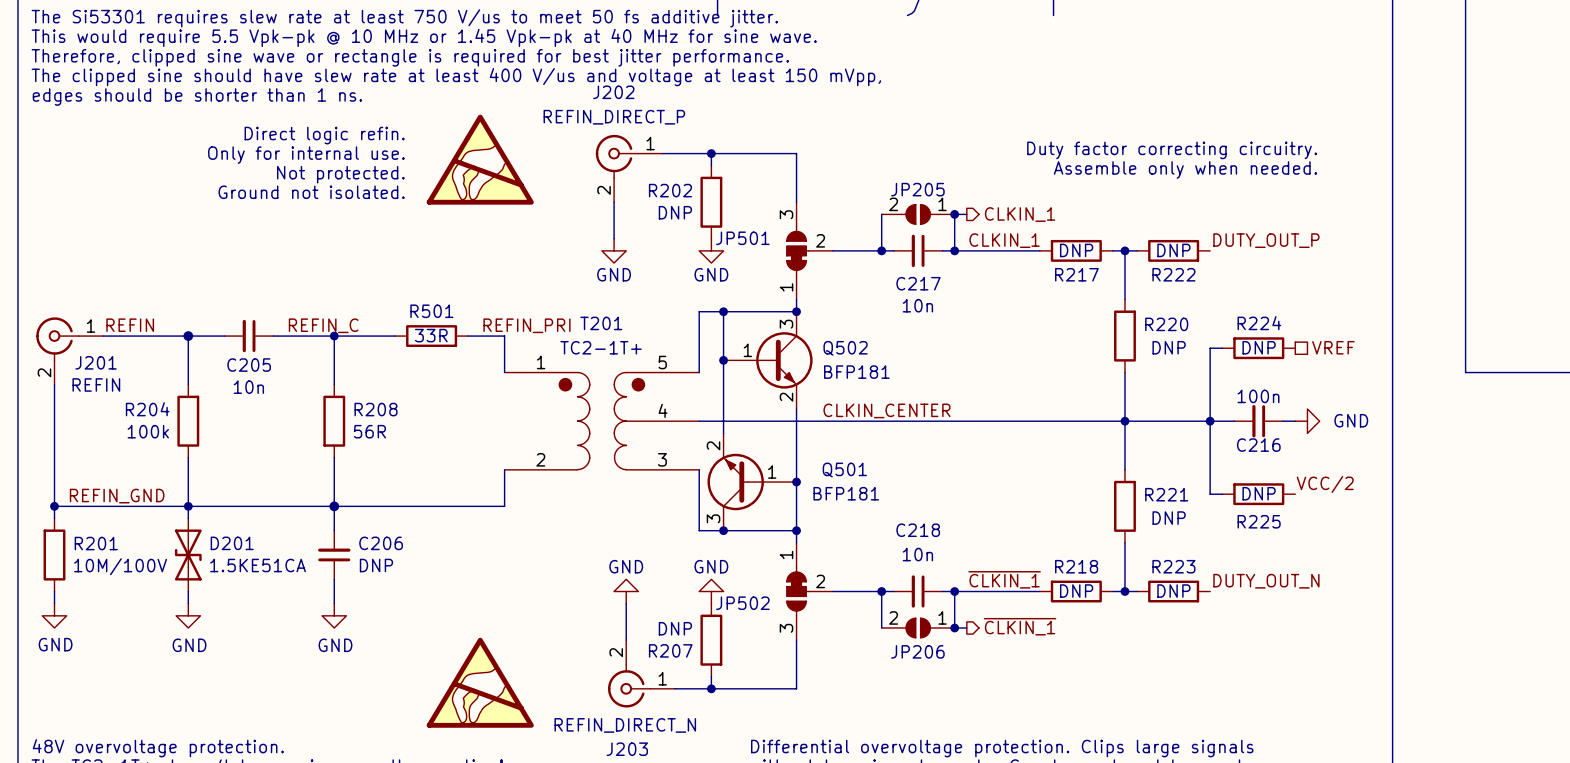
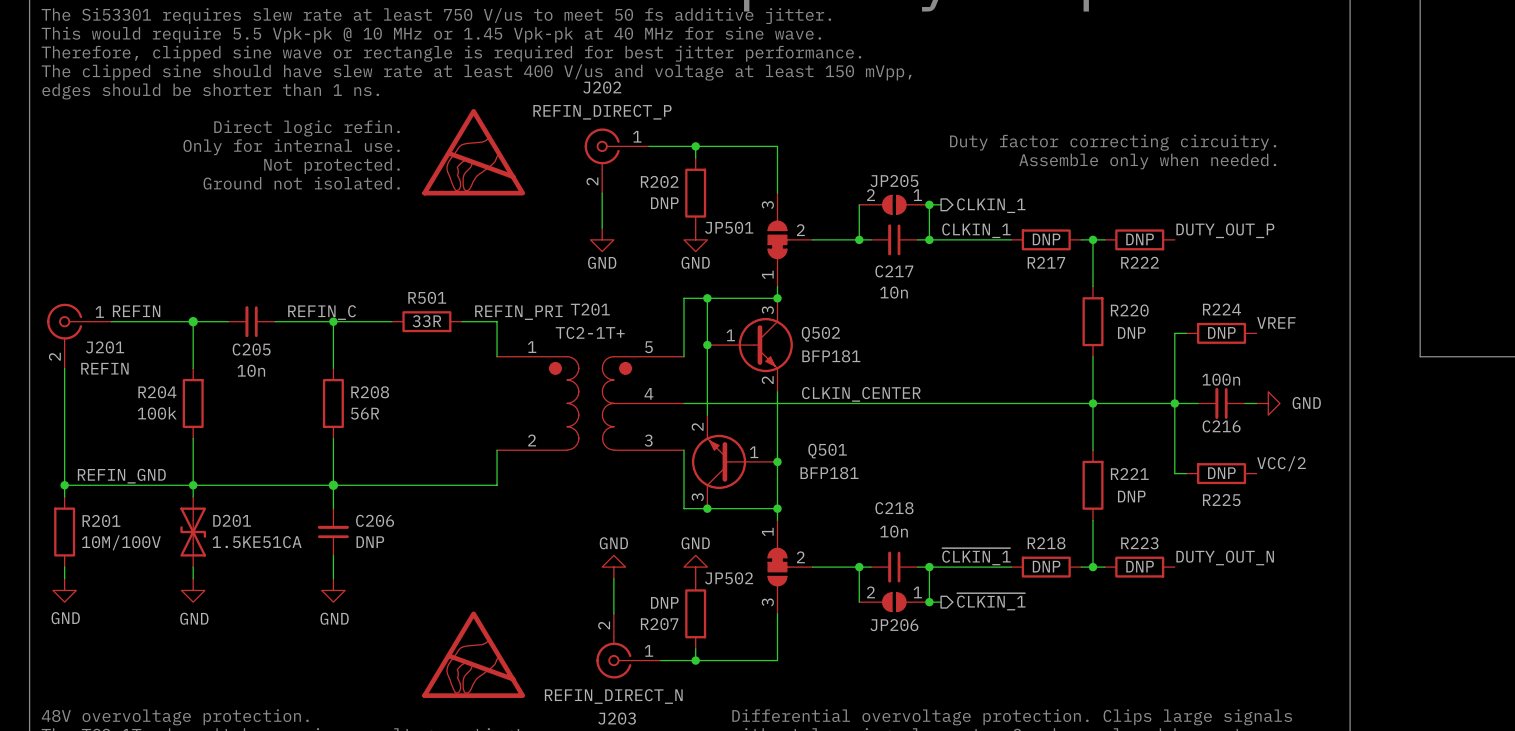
label: none -> VREF (1276, 322)
hierarchical label: VREF (1333, 347) -> none

